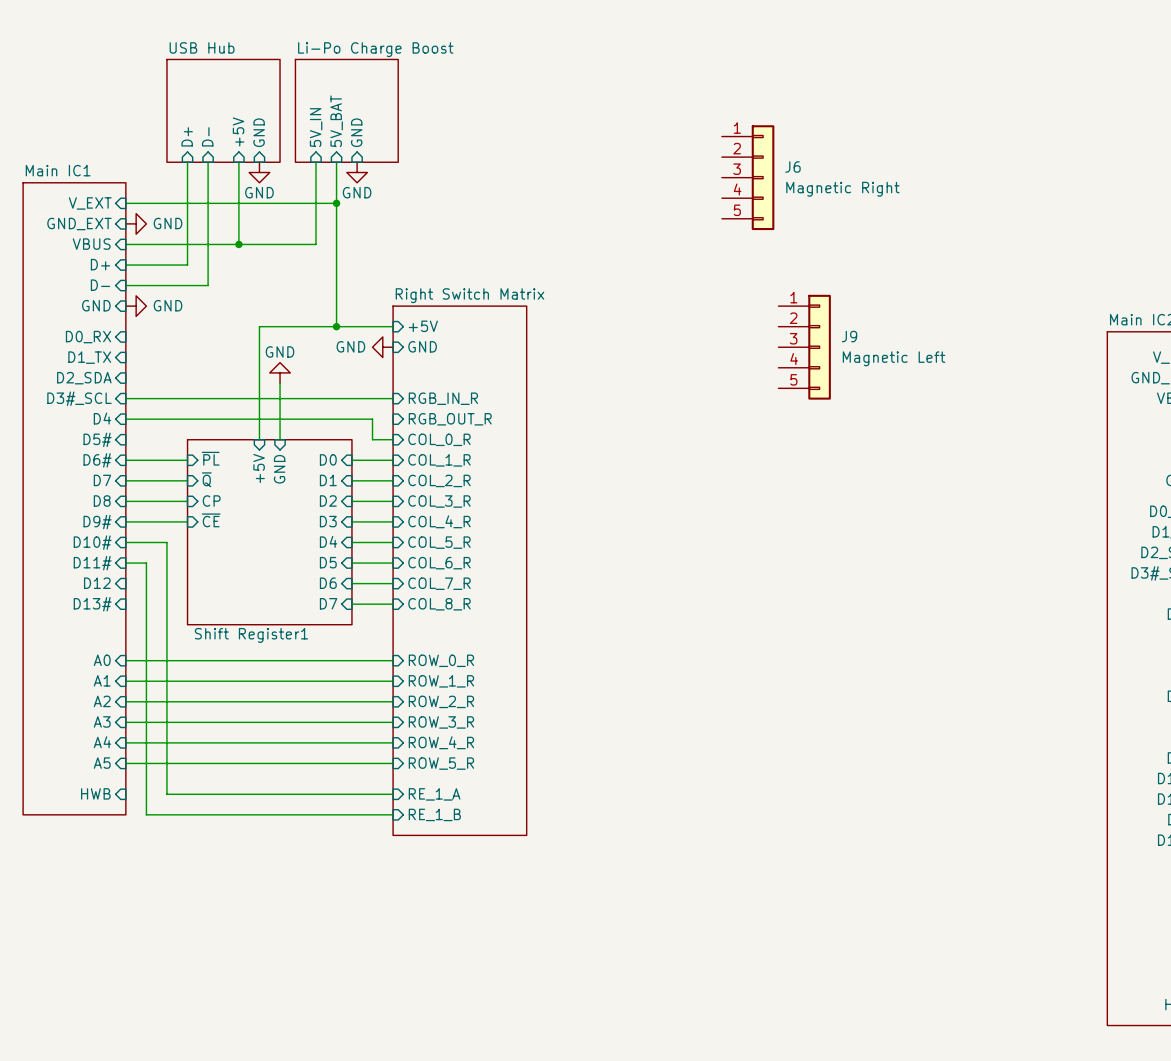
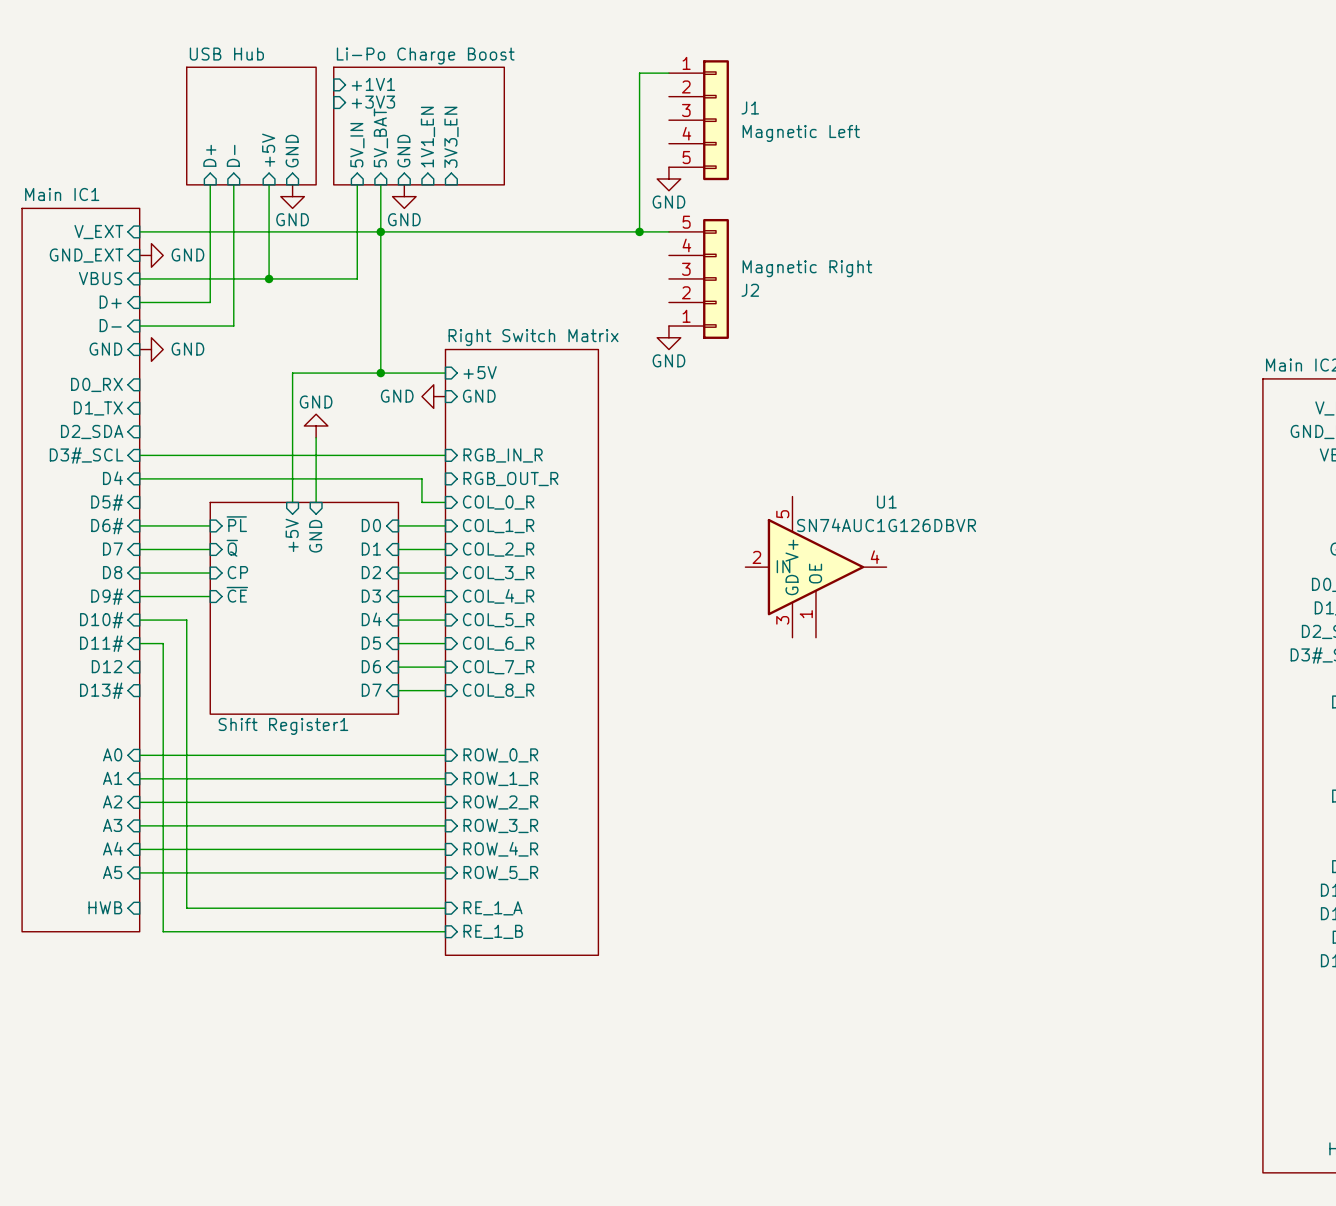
wire: none -> (668, 73) (639, 73) (639, 231)
sheet pin: none -> +1V1 (373, 84)
sheet pin: none -> +3V3 (373, 102)
J1: none -> Magnetic Left (698, 120)
sheet Li-Po Charge Boost: (346, 110) -> none
sheet Li-Po Charge Boost: none -> (419, 126)
sheet pin: none -> 1V1_EN (427, 137)
sheet pin: none -> 3V3_EN (451, 137)
power symbol: none -> GND (668, 178)
J6: Magnetic Right (748, 177) -> none
wire: none -> (380, 231) (668, 231)
junction: none -> (639, 231)
J2: none -> Magnetic Right (698, 278)
power symbol: none -> GND (668, 337)
J9: Magnetic Left (804, 347) -> none
U1: none -> SN74AUC1G126DBVR (815, 567)

